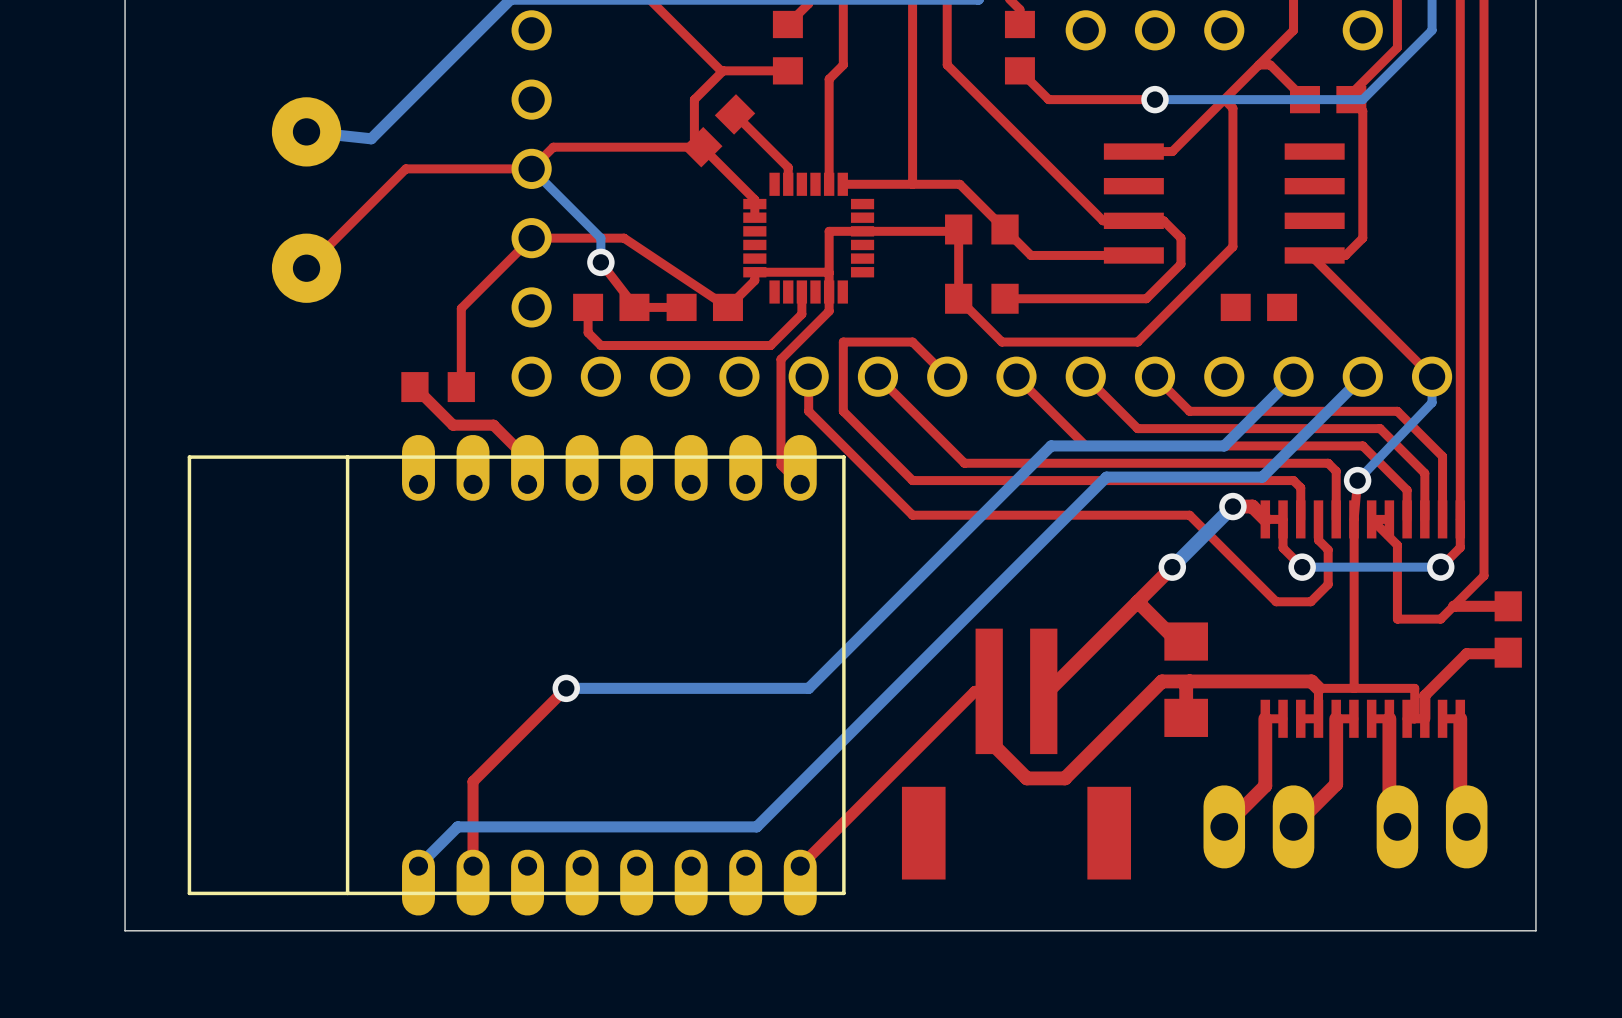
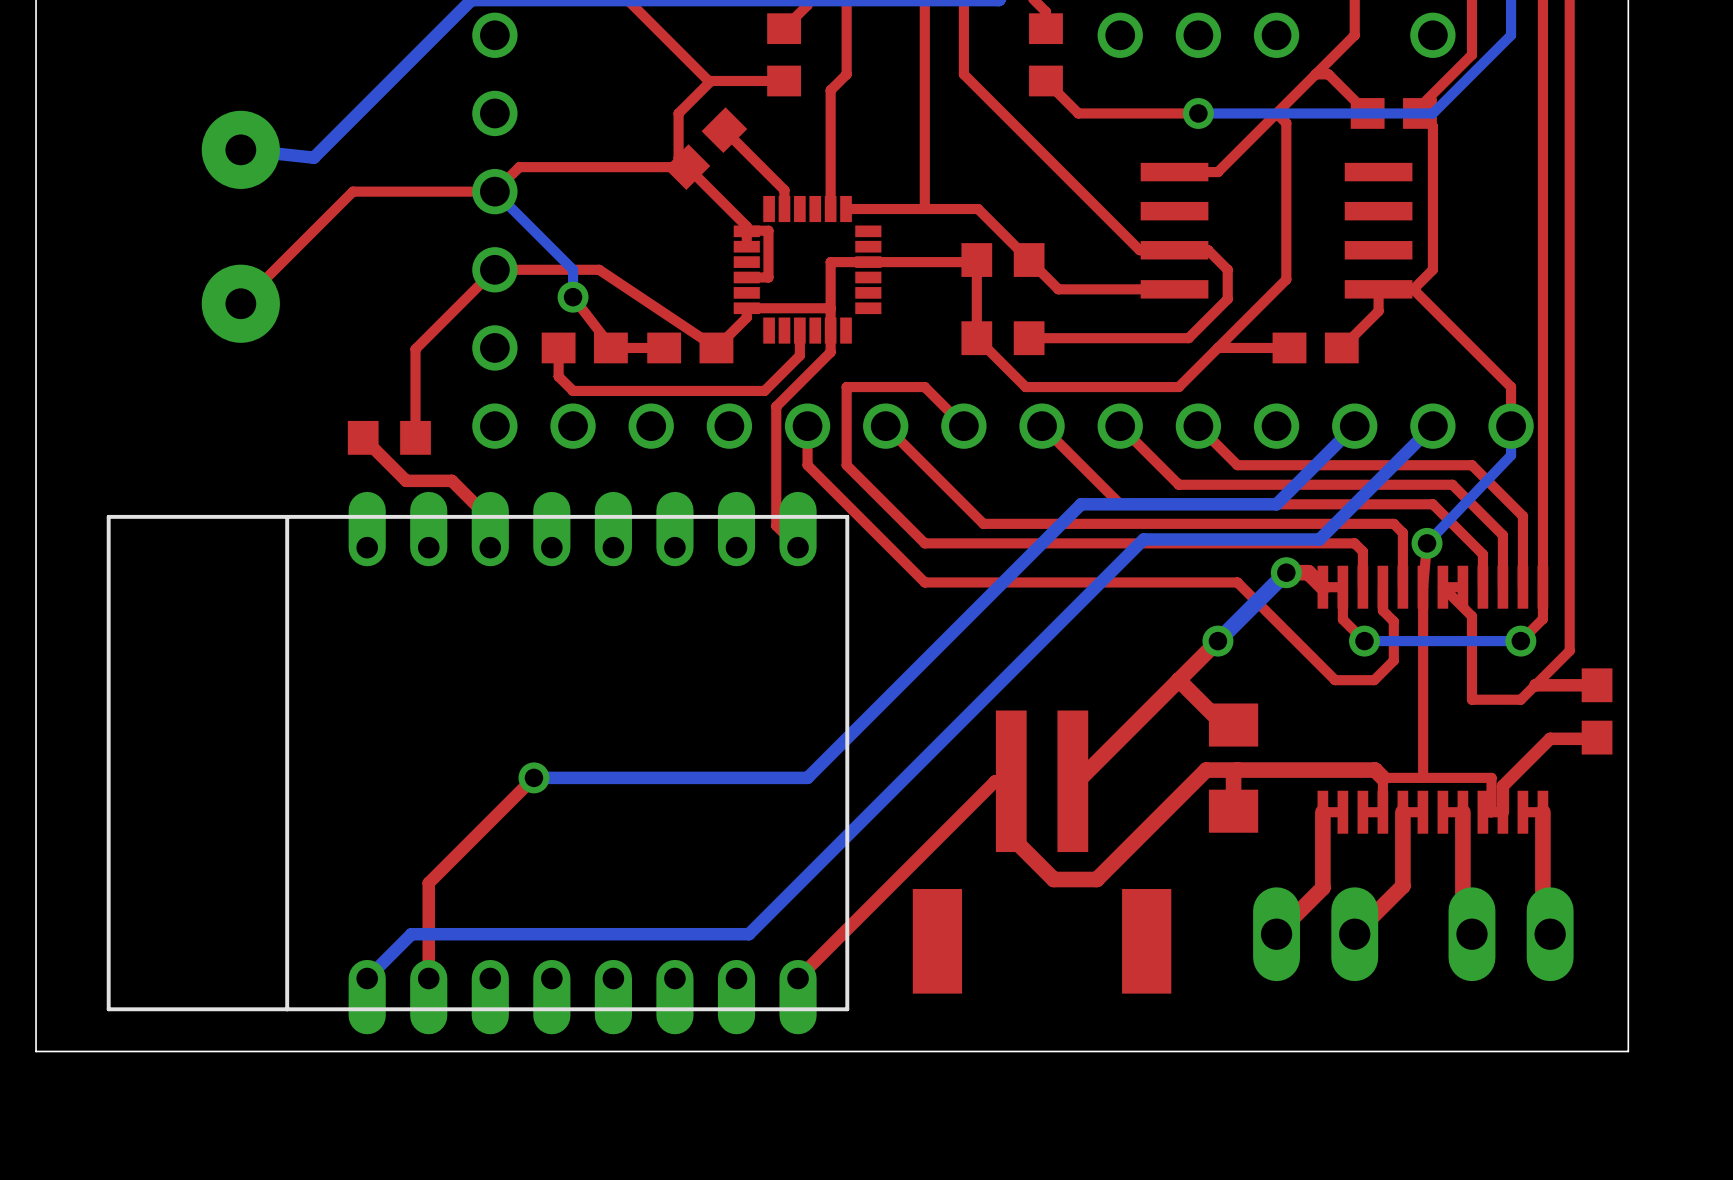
top track: none -> (746, 230) (768, 230) (768, 277) (746, 277)
top track: (1314, 259) (1432, 376) -> (1413, 289) (1511, 387) (1511, 426)
top track: none -> (1378, 293) (1378, 311) (1341, 347)
top track: none -> (1289, 347) (1217, 347)

